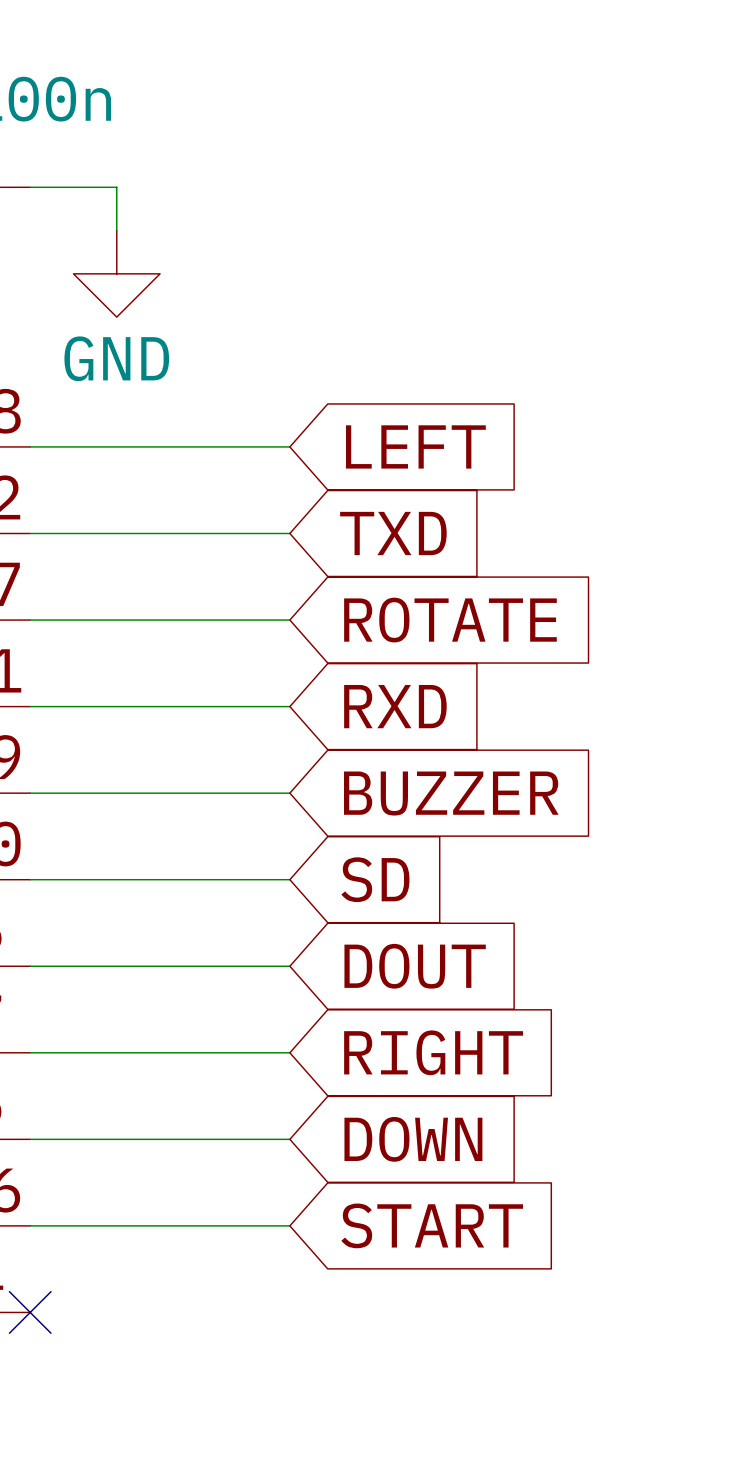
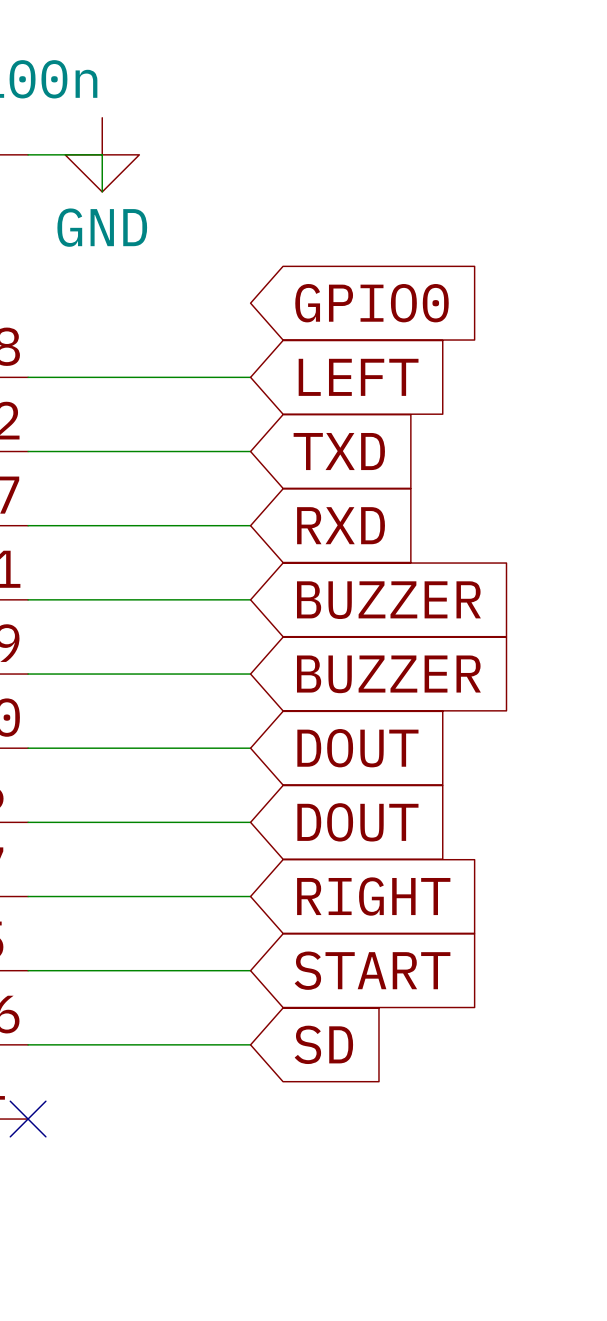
power symbol position: GND (116, 273) -> GND (102, 154)
global label: none -> GPIO0 (372, 303)
global label: ROTATE (450, 620) -> RXD (341, 525)
global label: RXD (395, 706) -> BUZZER (388, 600)
global label: SD (375, 879) -> DOUT (357, 748)
global label: DOWN (413, 1139) -> START (372, 970)
global label: START (432, 1225) -> SD (323, 1044)

